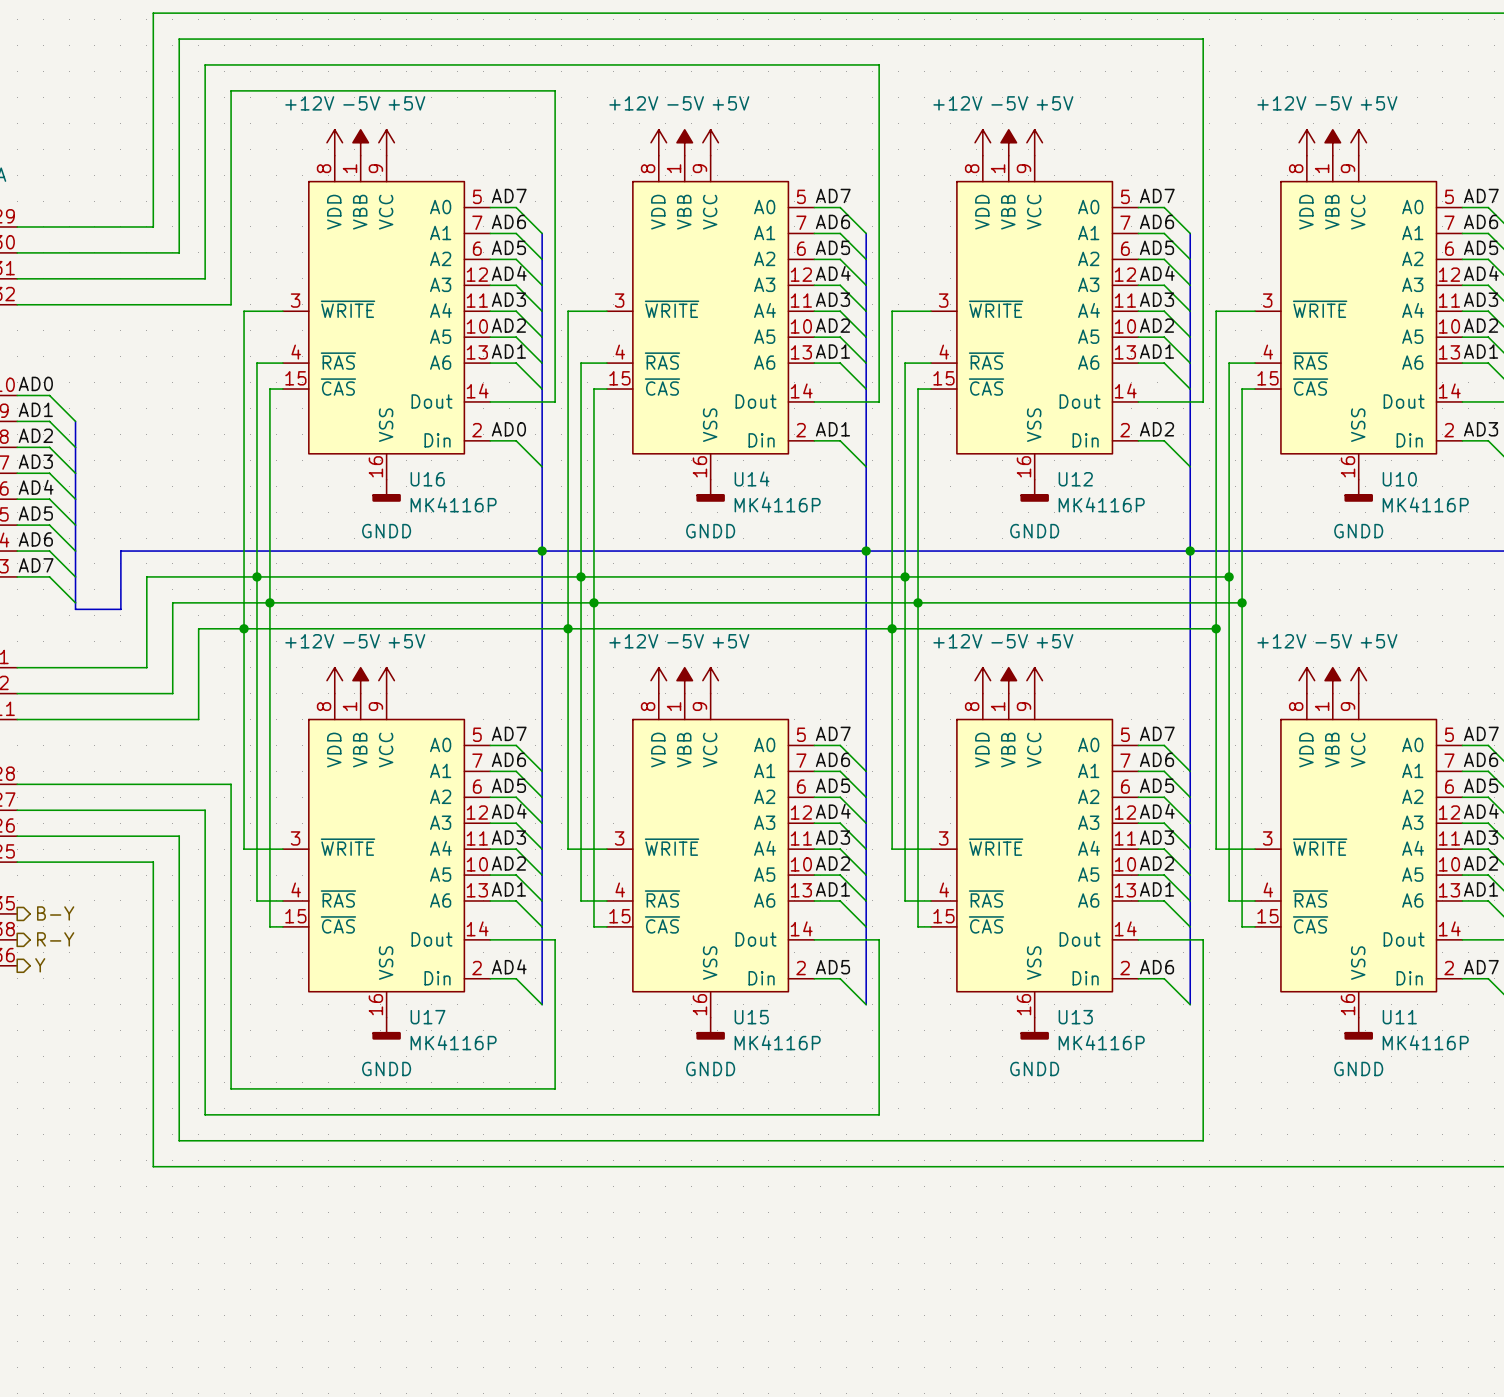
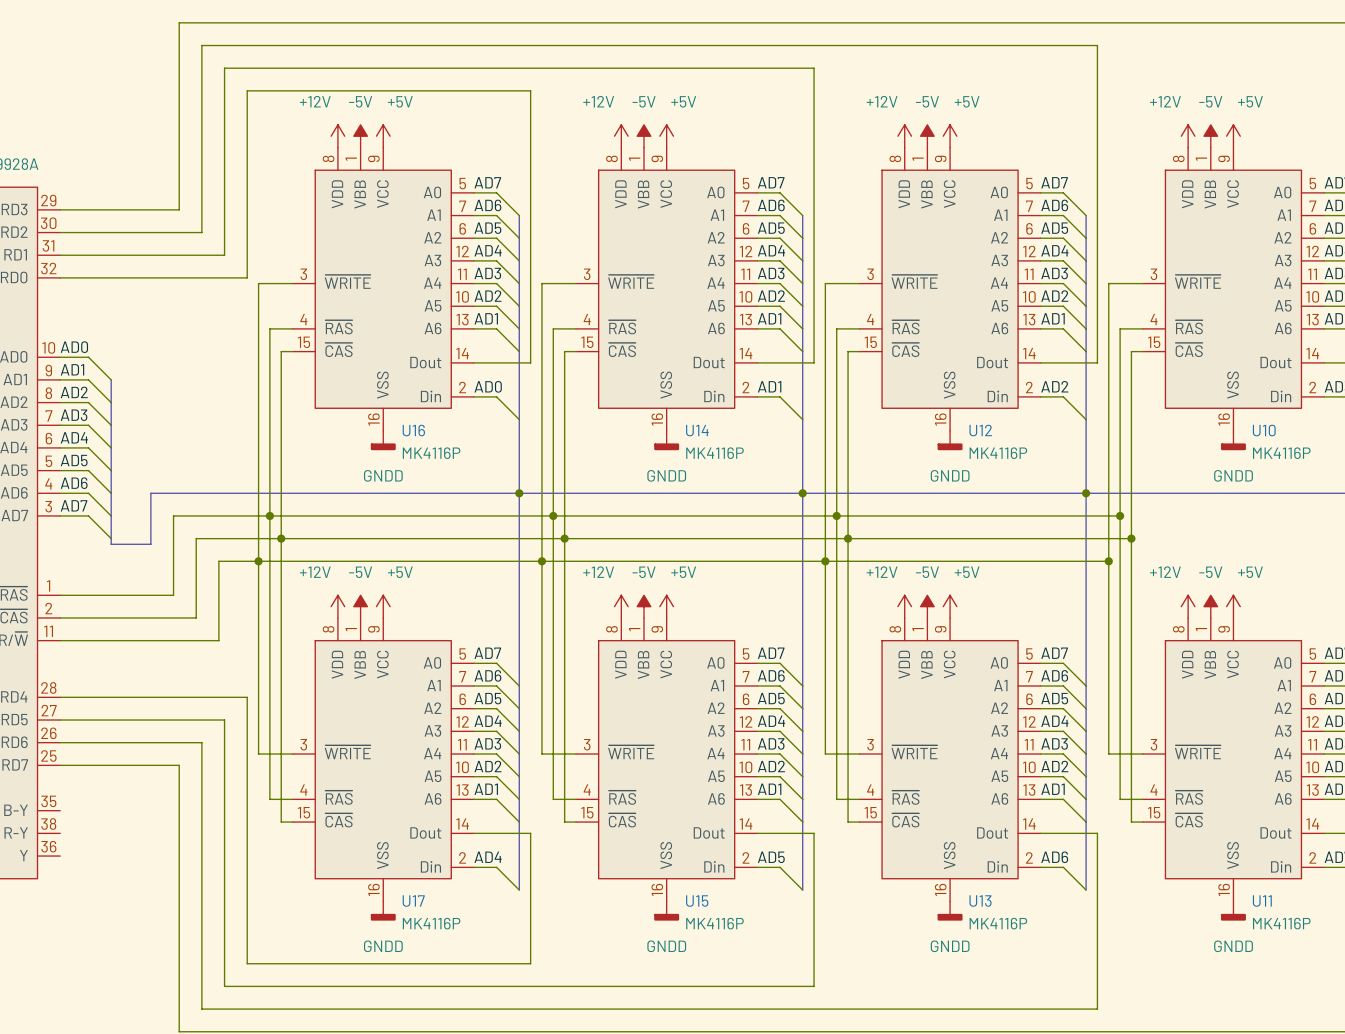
hierarchical label: B-Y (55, 913) -> none
hierarchical label: R-Y (55, 939) -> none
hierarchical label: Y (40, 965) -> none

